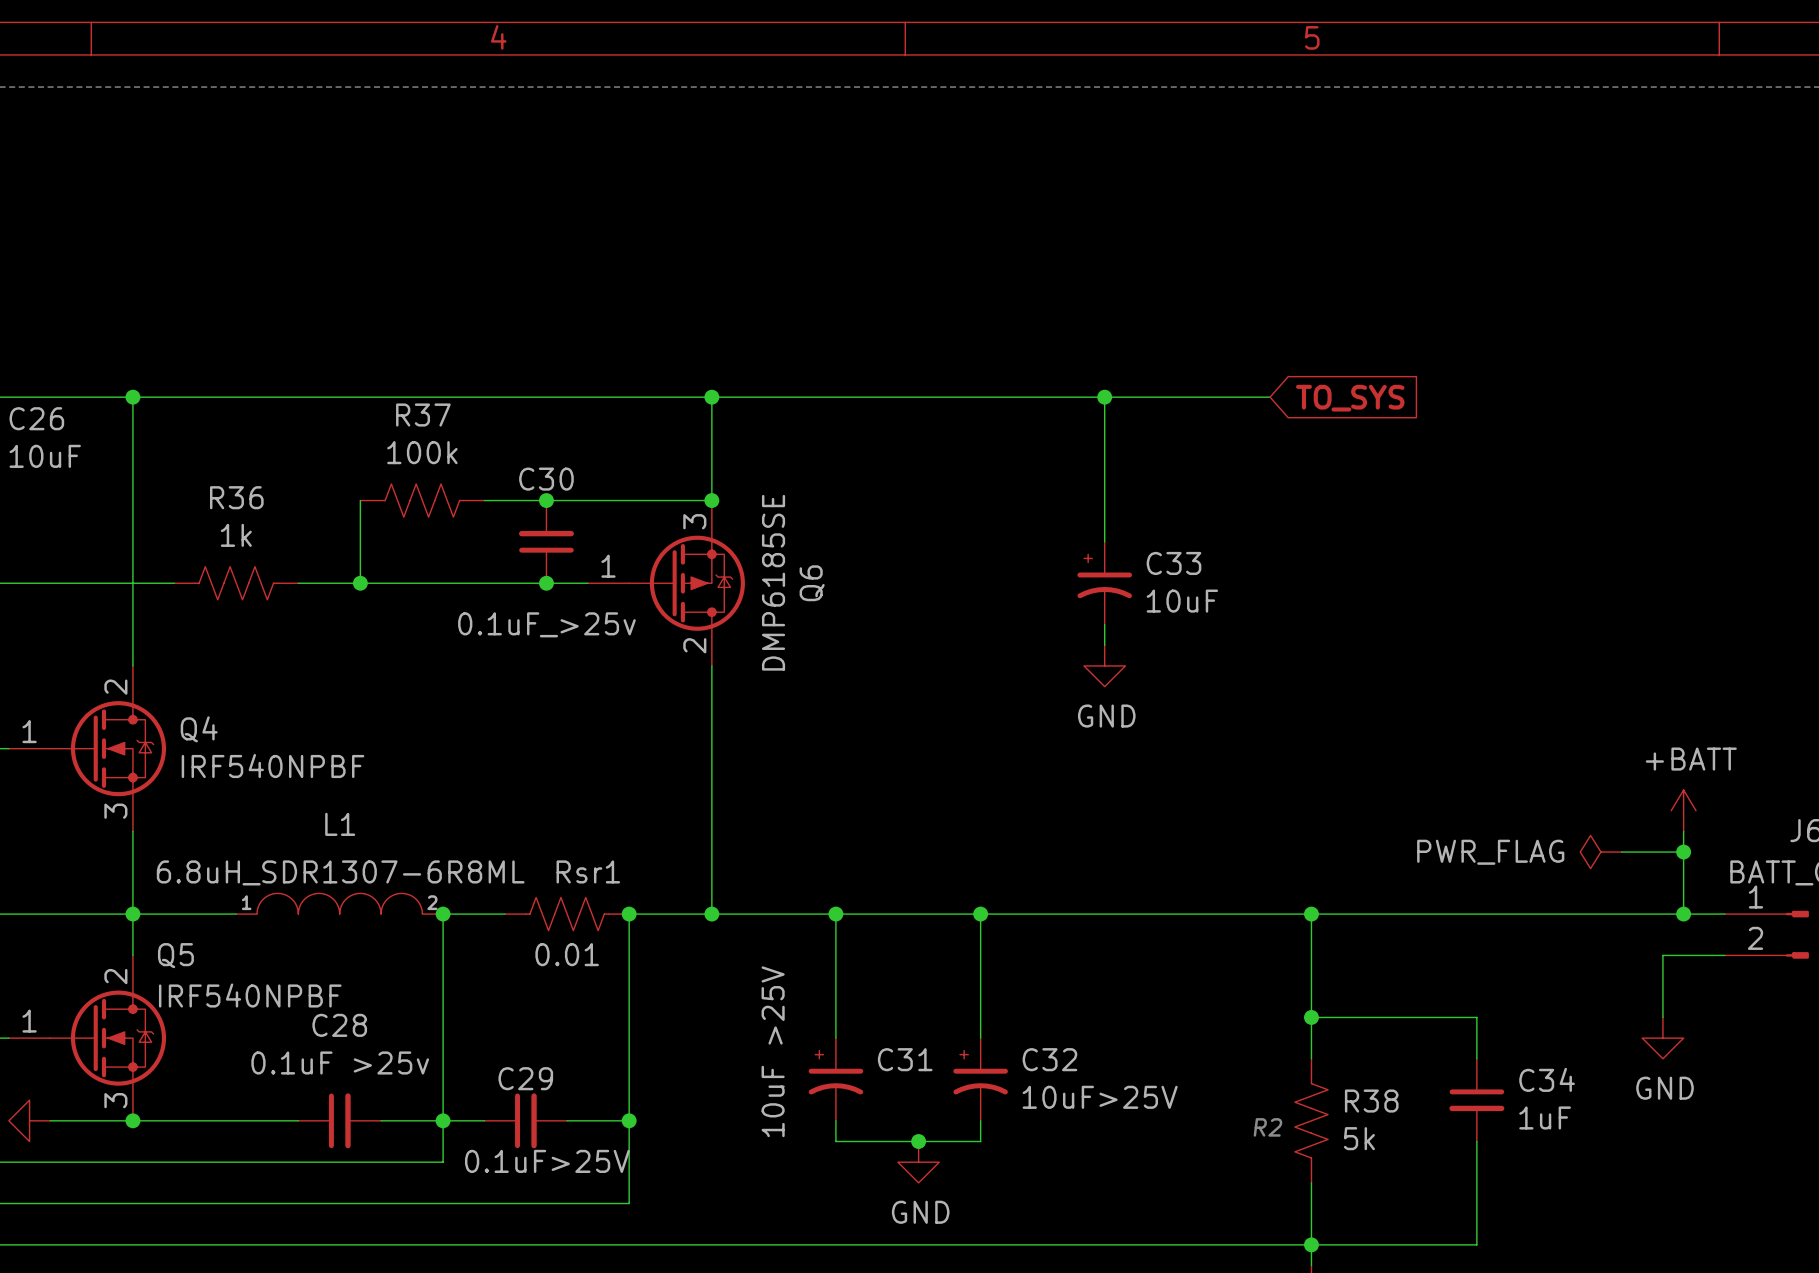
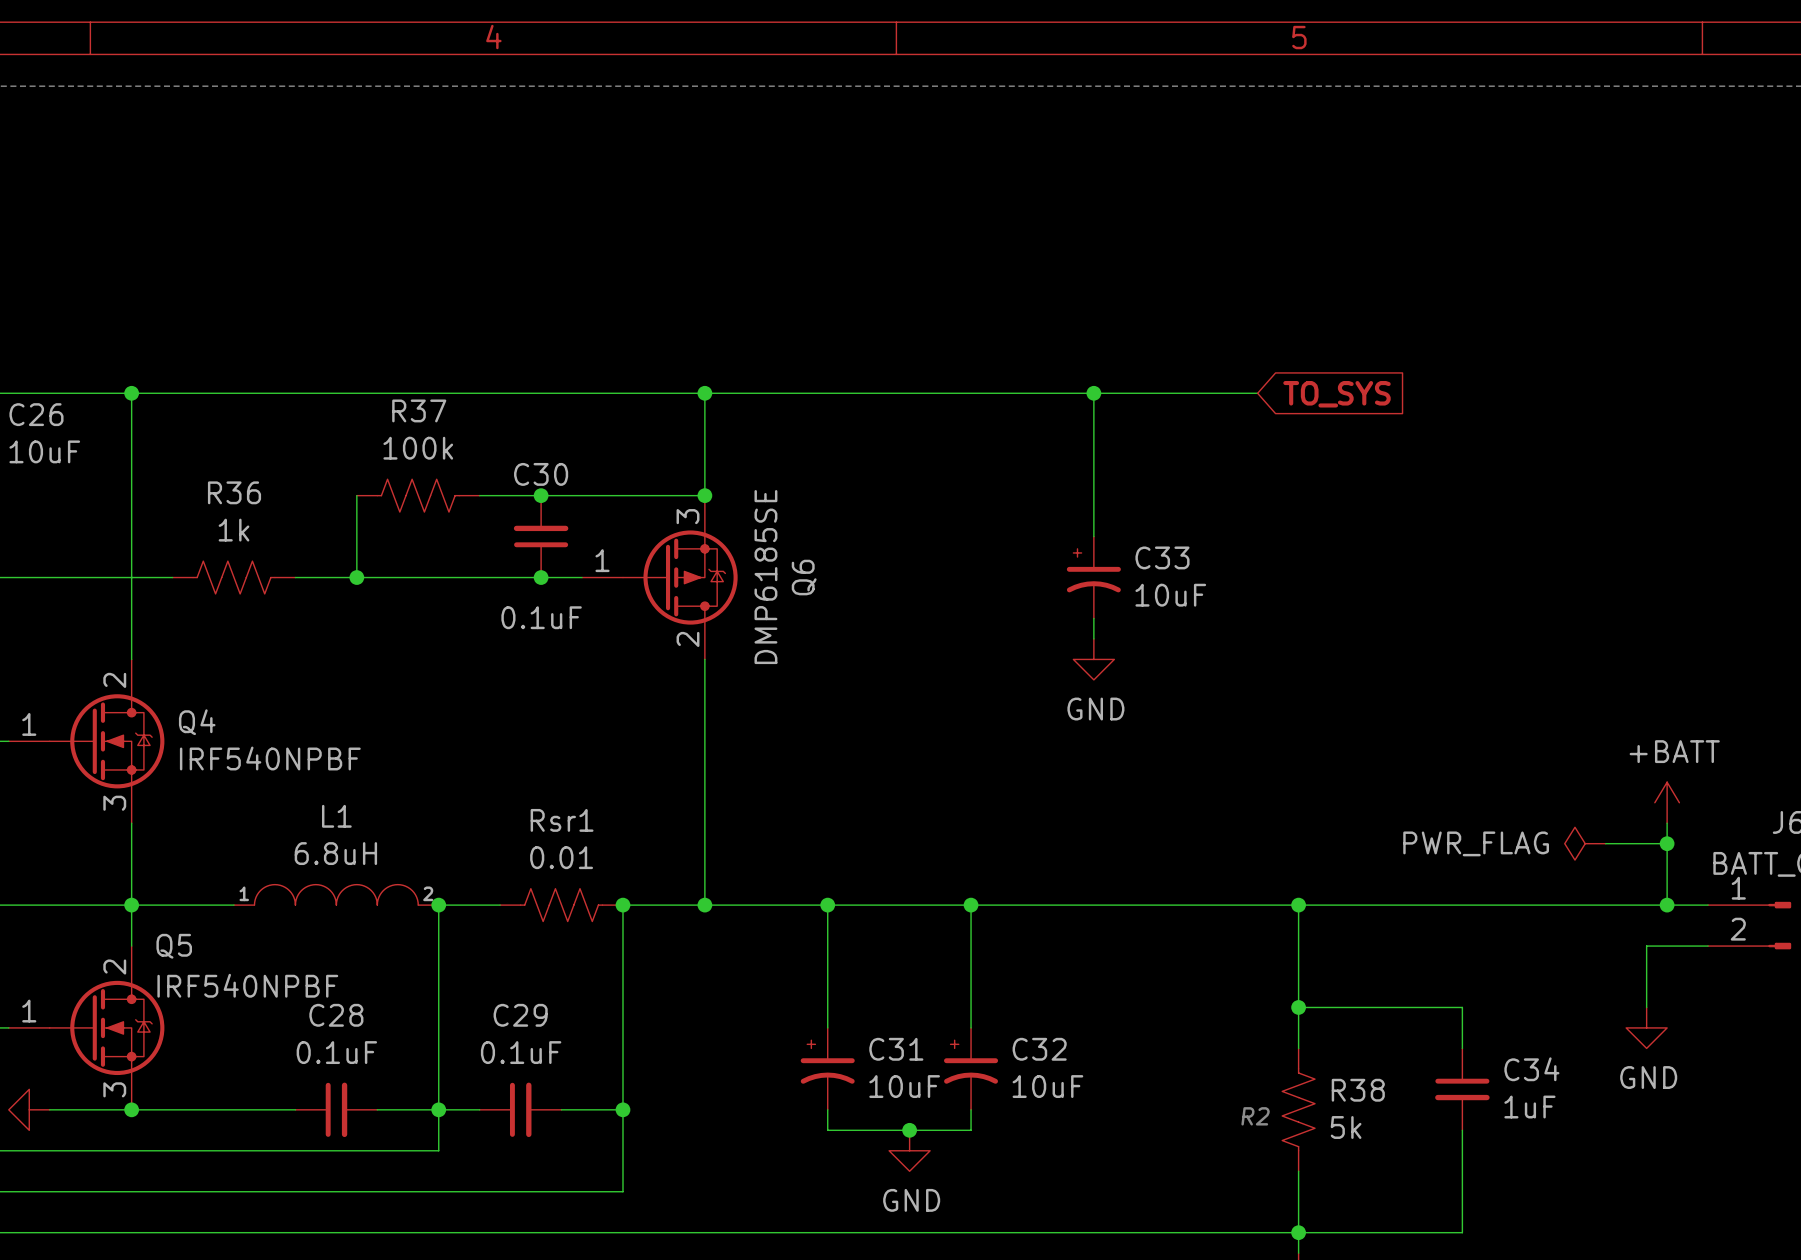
C30 value: 0.1uF_>25v (546, 624) -> 0.1uF (541, 617)
Rsr1 name position: Rsr1 (588, 871) -> Rsr1 (562, 820)
L1 value: 6.8uH_SDR1307-6R8ML (340, 872) -> 6.8uH (335, 853)
Rsr1 value position: 0.01 (567, 954) -> 0.01 (561, 857)
C31 value: 10uF >25V (773, 1051) -> 10uF (904, 1086)
C28 value: 0.1uF >25v (340, 1062) -> 0.1uF (336, 1052)
C29 name position: C29 (525, 1078) -> C29 (520, 1015)
C32 value: 10uF>25V (1100, 1097) -> 10uF (1047, 1086)
C29 value: 0.1uF>25V (547, 1161) -> 0.1uF (521, 1052)

